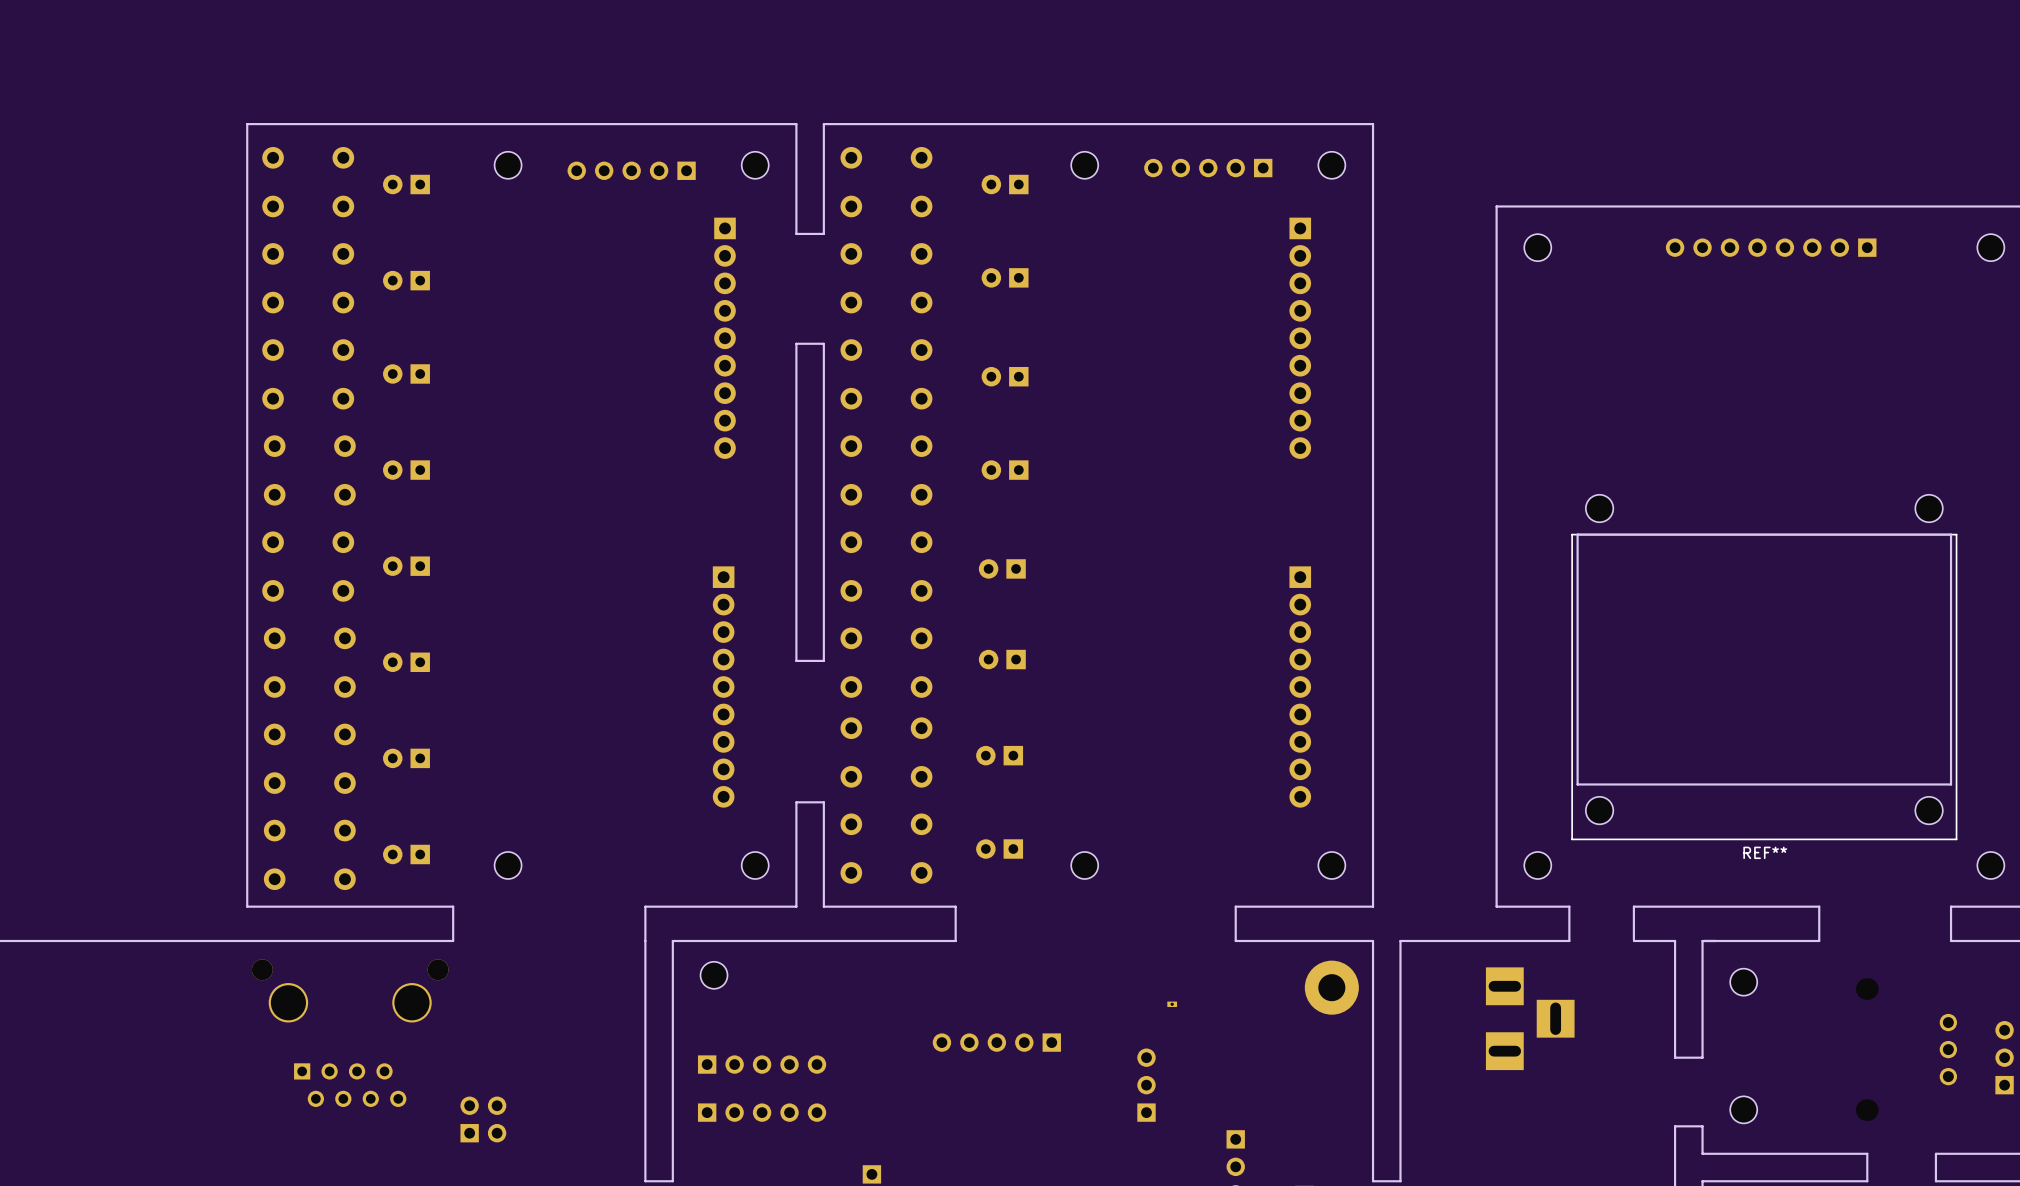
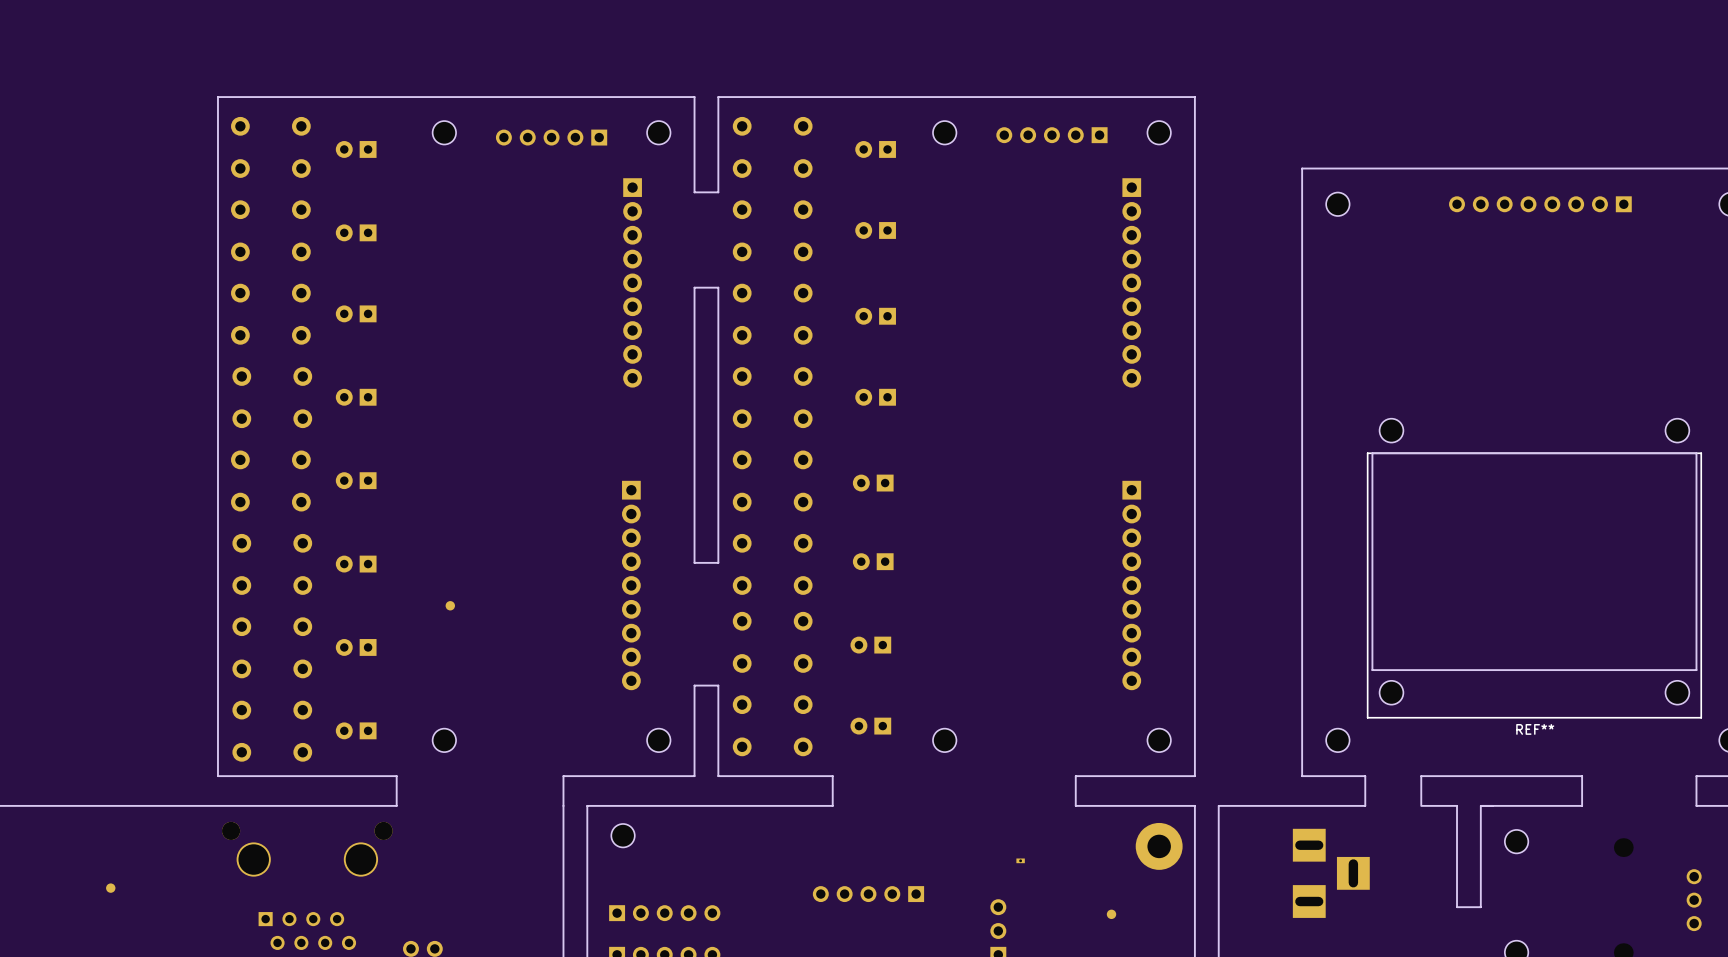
part: none -> (450, 605)
part: none -> (110, 888)
part: none -> (1111, 914)

